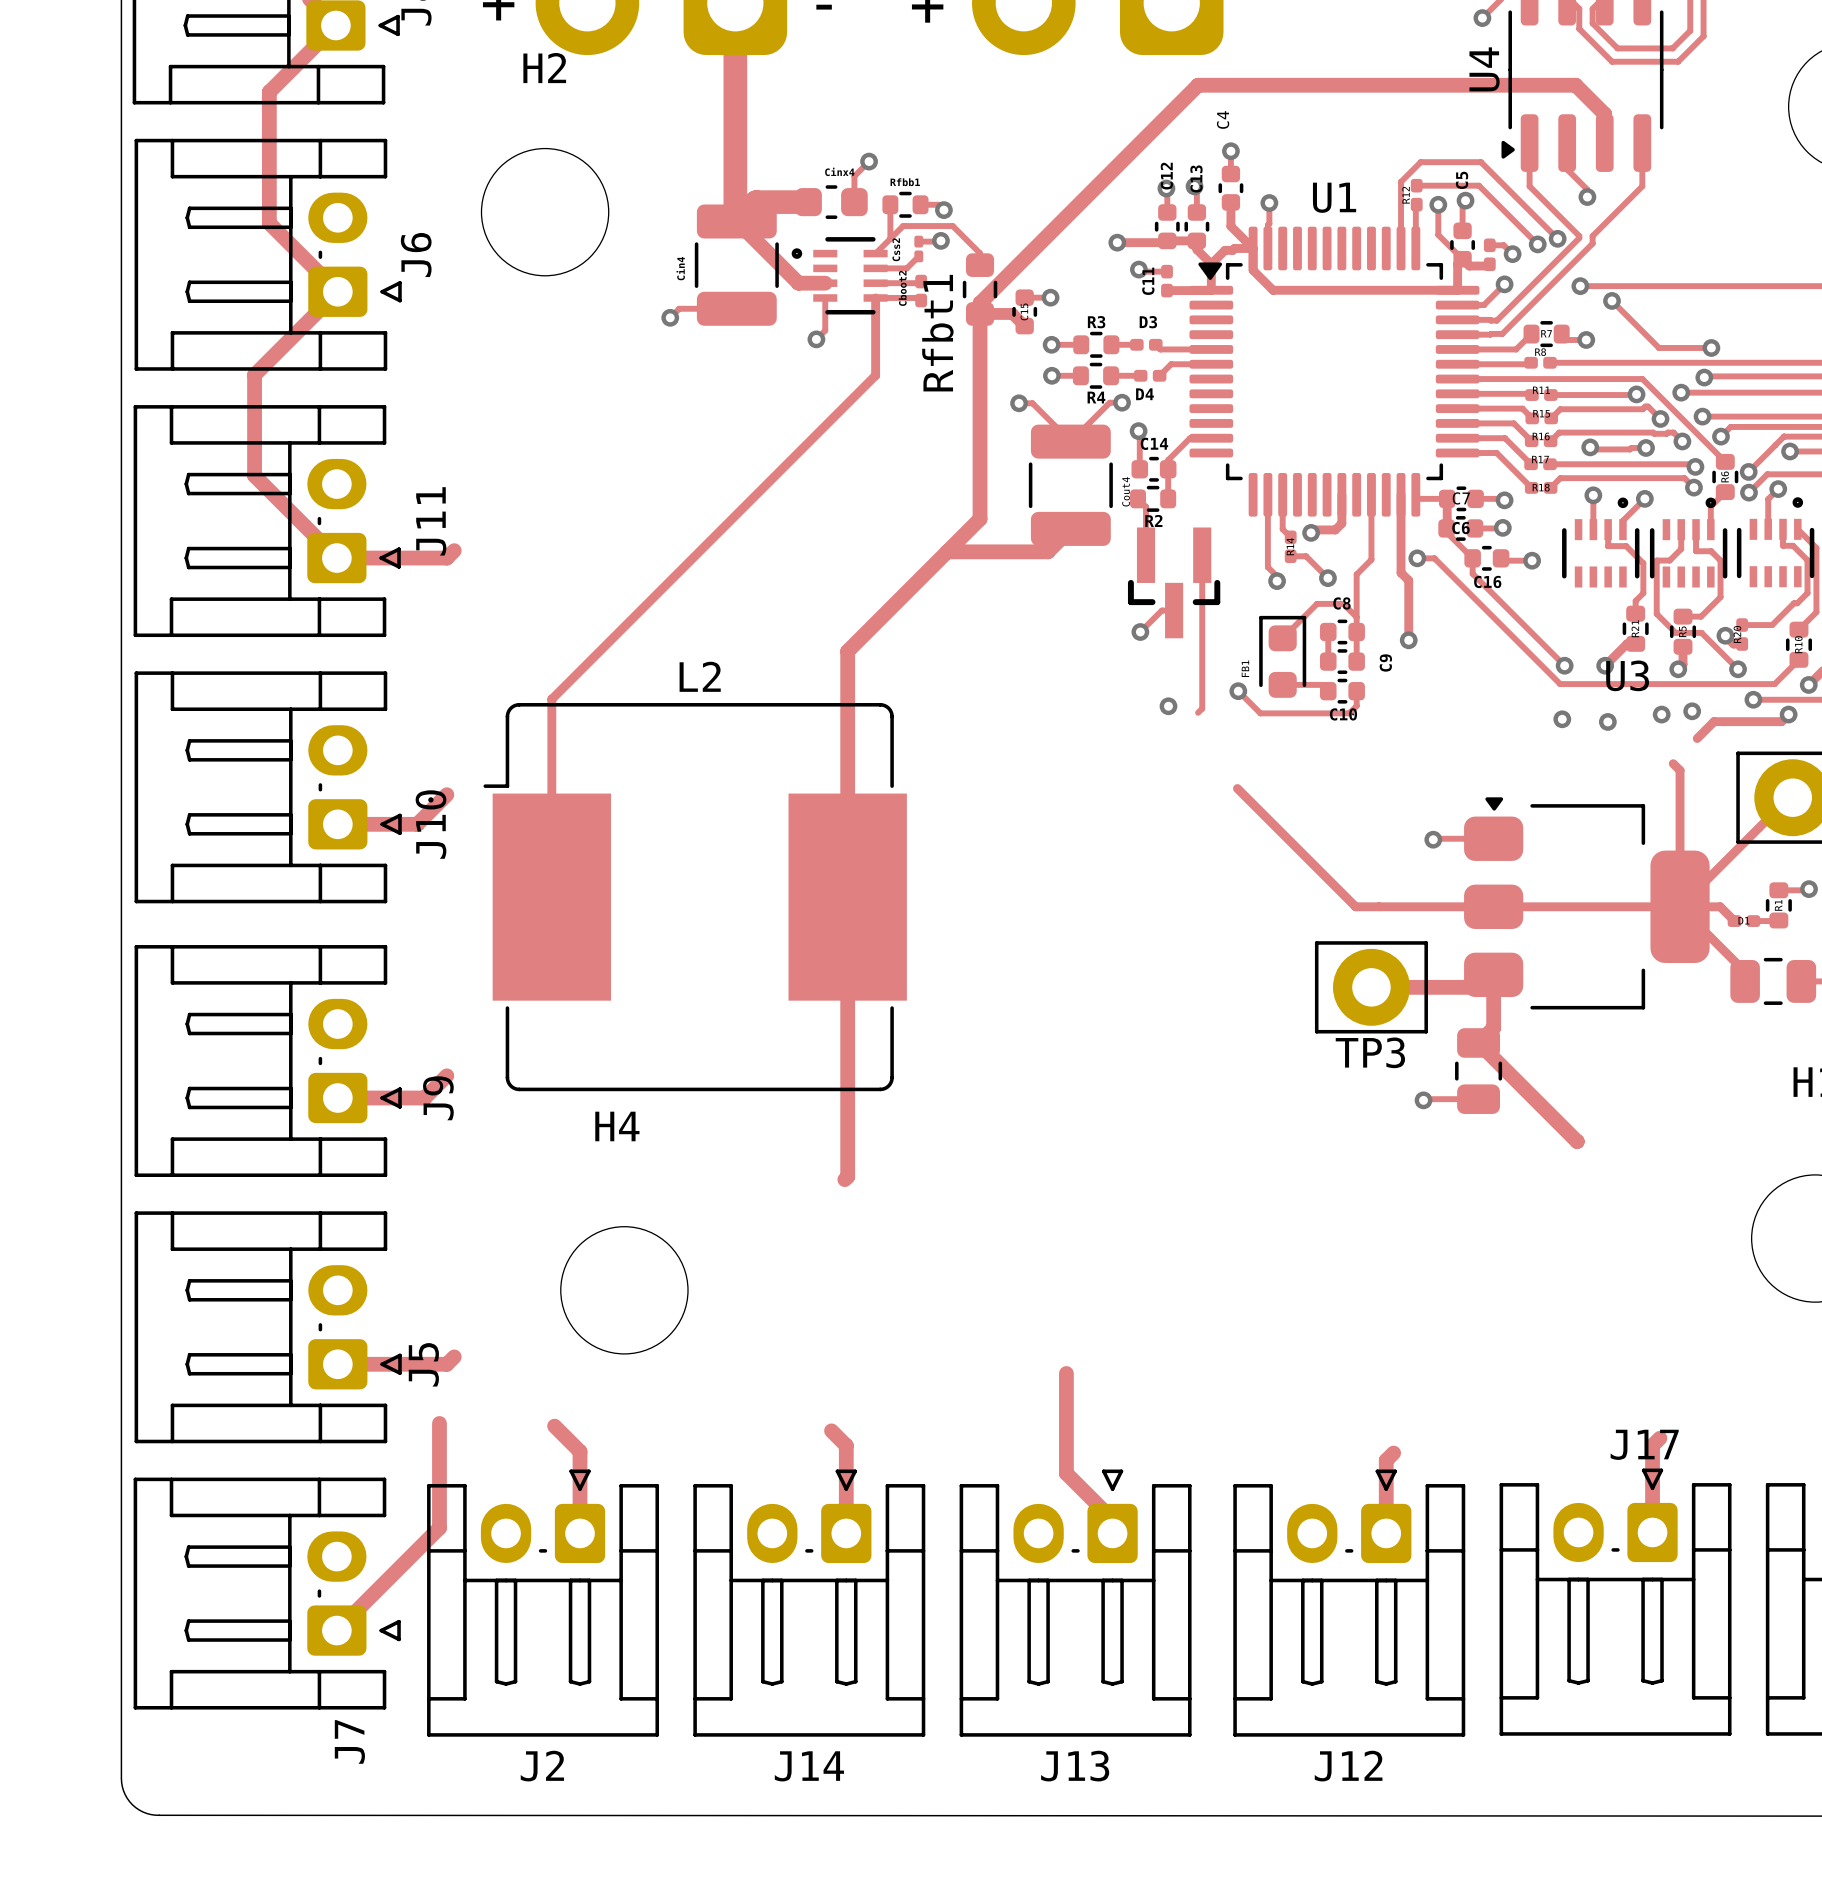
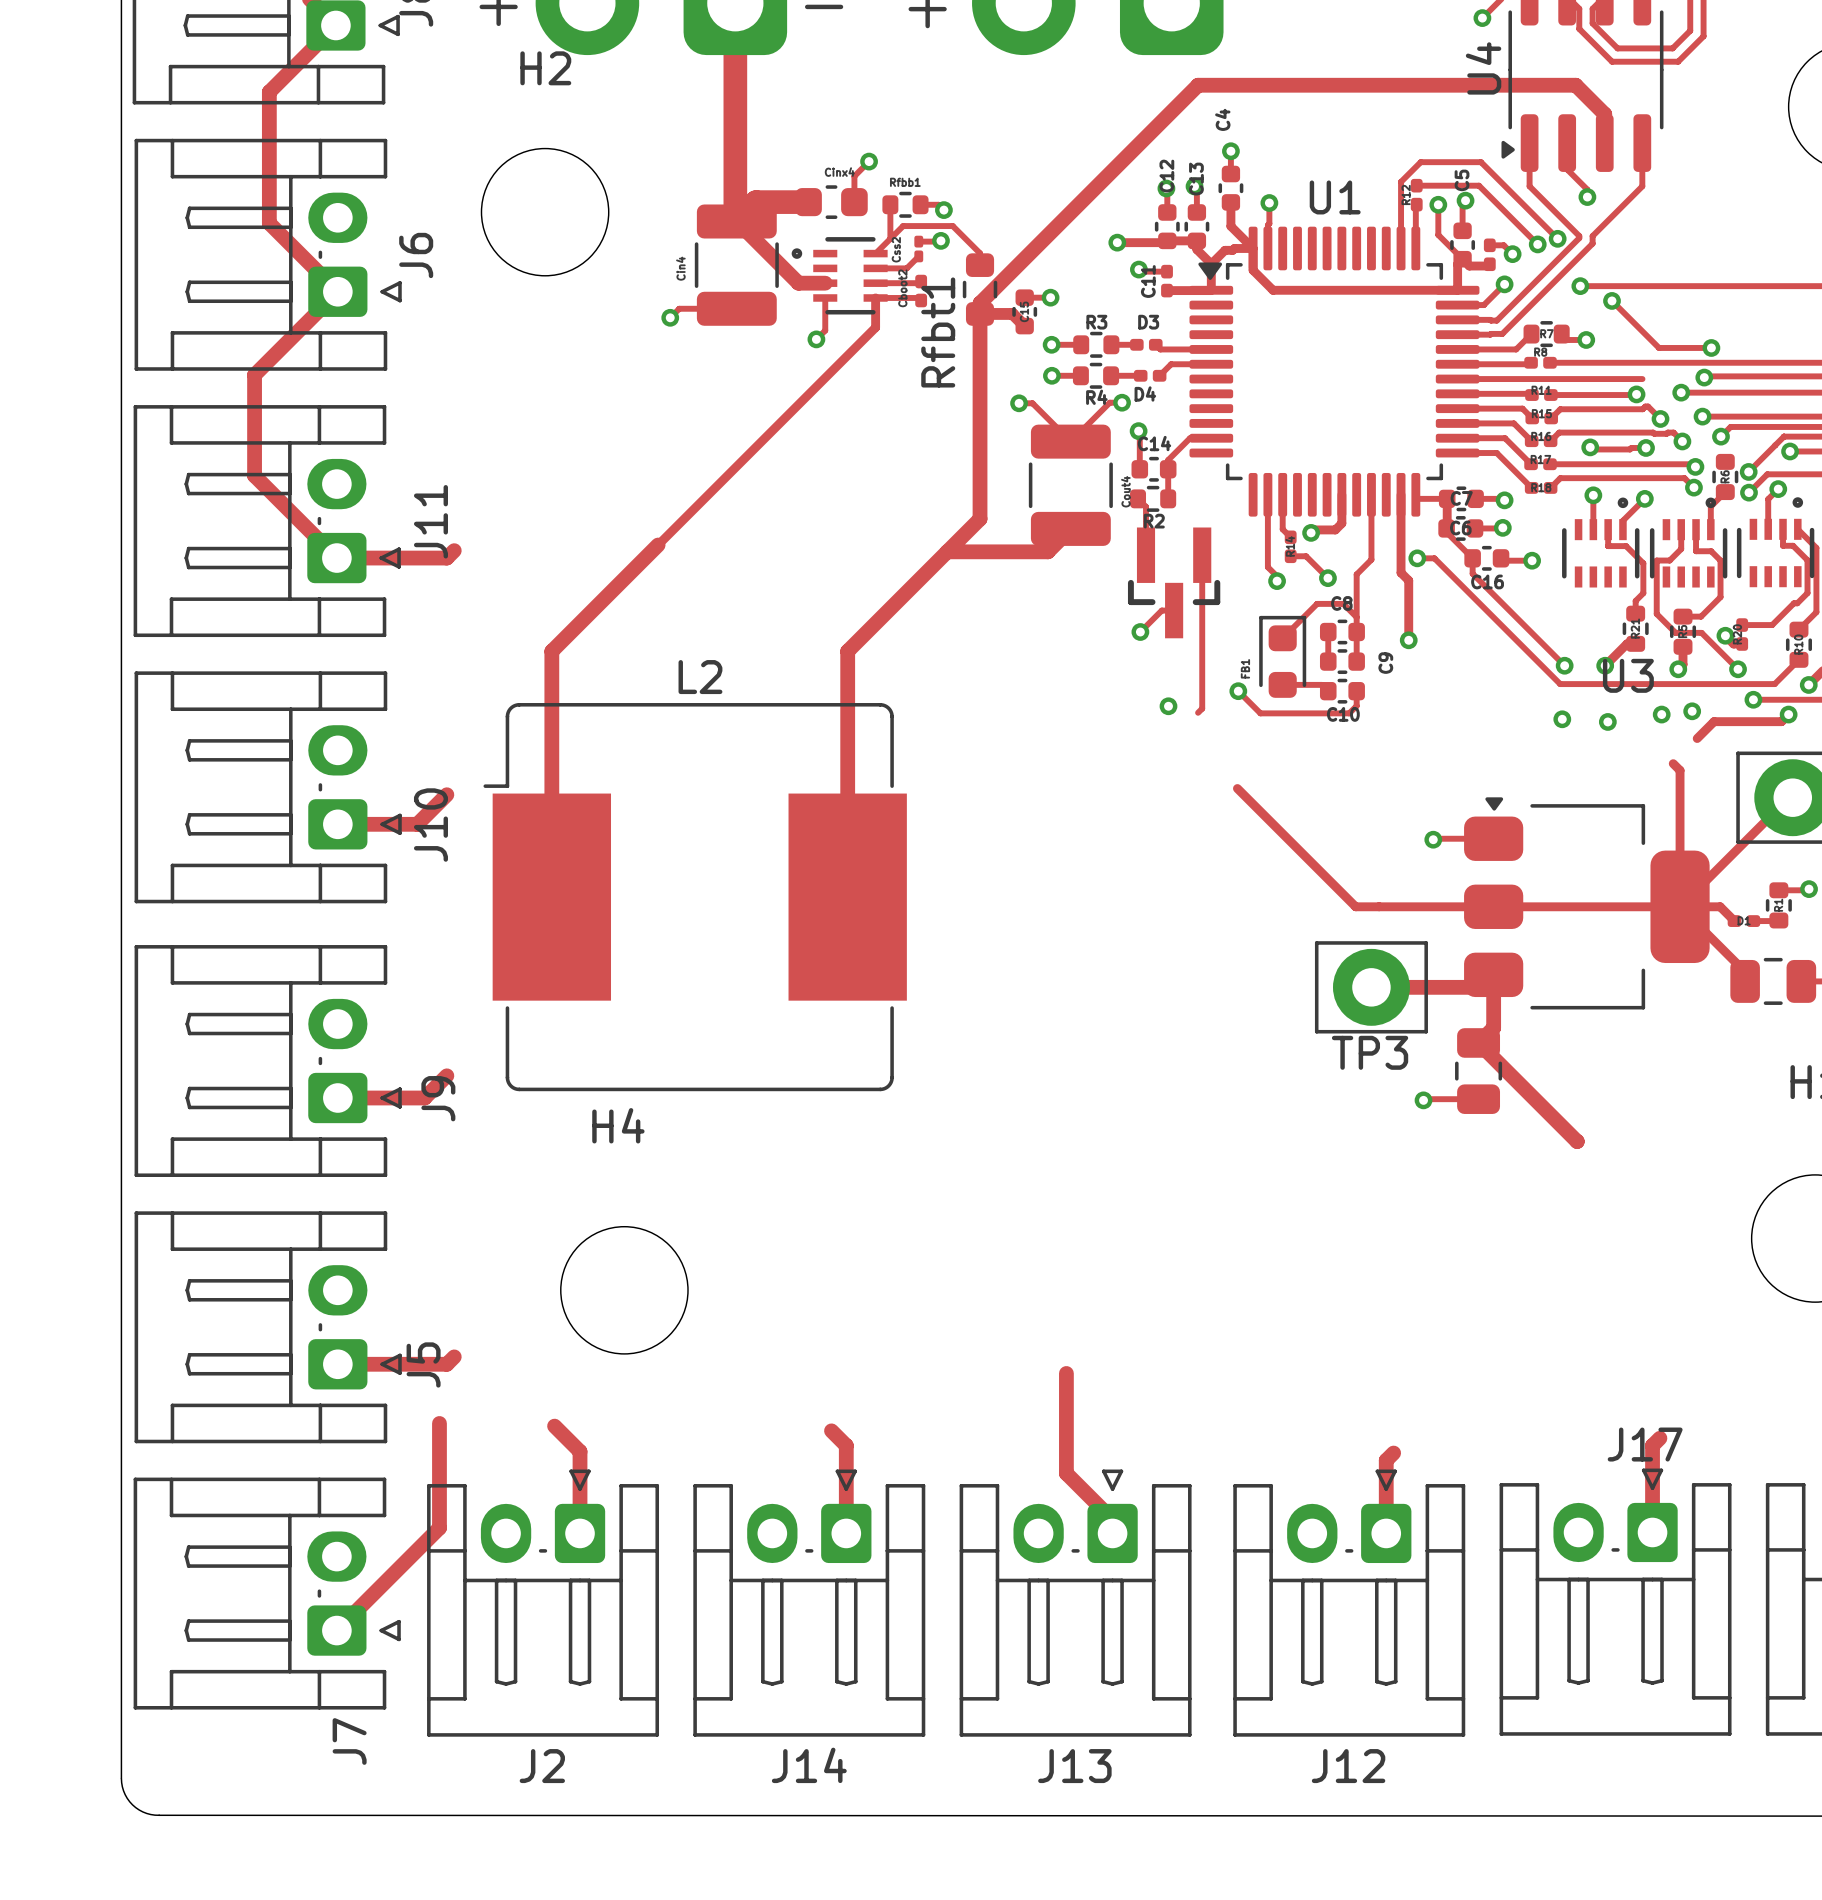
track: (875, 327) (875, 375) (551, 699) -> (875, 327) (651, 551)
track: (1642, 379) (1725, 461) -> none
track: none -> (658, 545) (551, 651) (551, 699)
track width: thin (551, 699) (551, 897) -> thick (551, 699) (551, 897)
track: (847, 897) (847, 1176) (844, 1179) -> none

